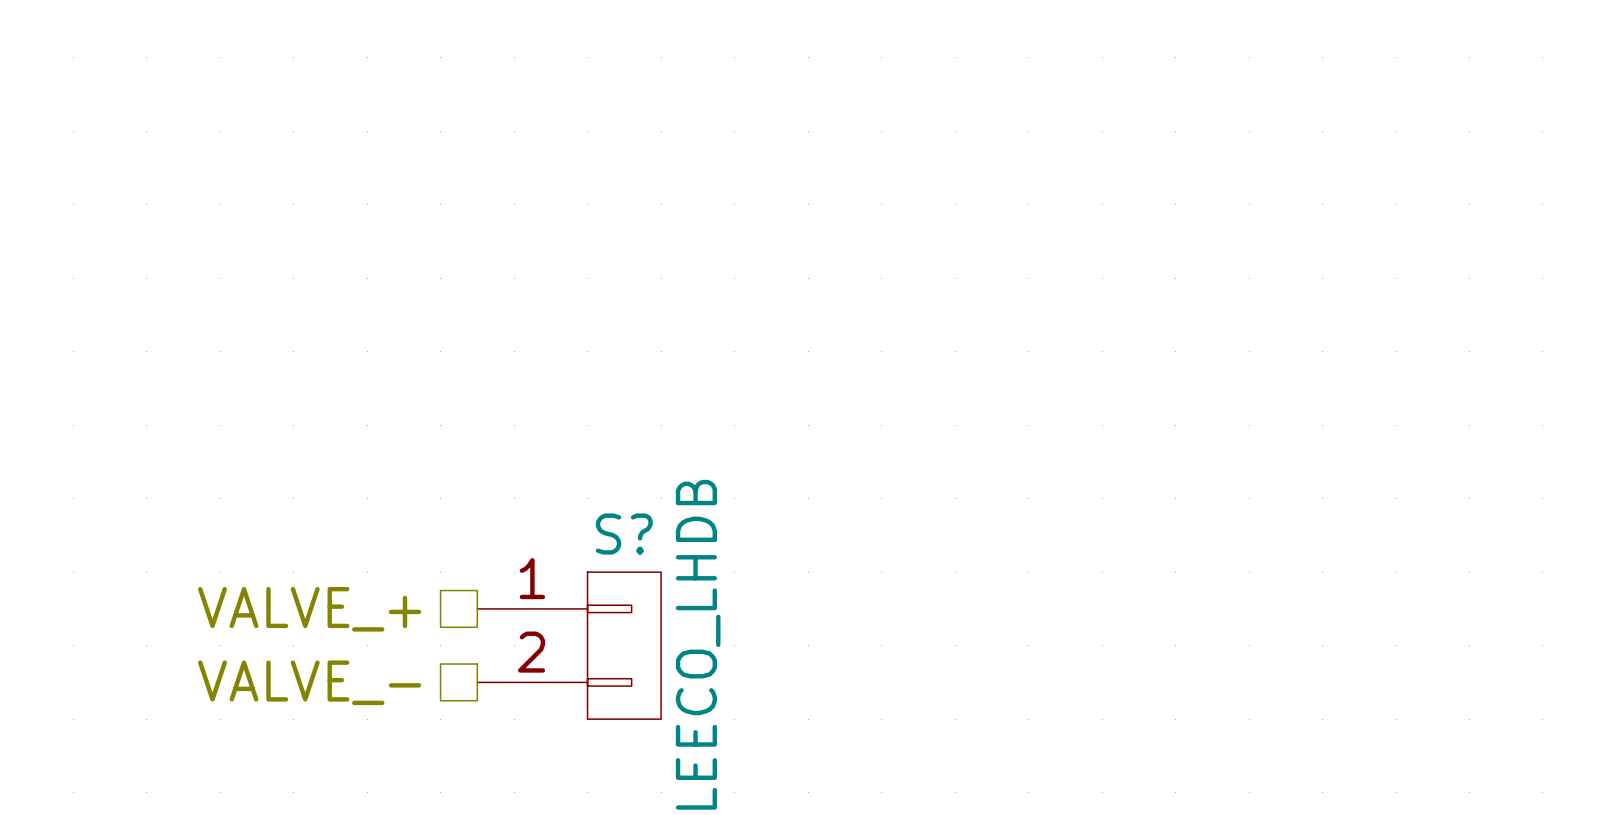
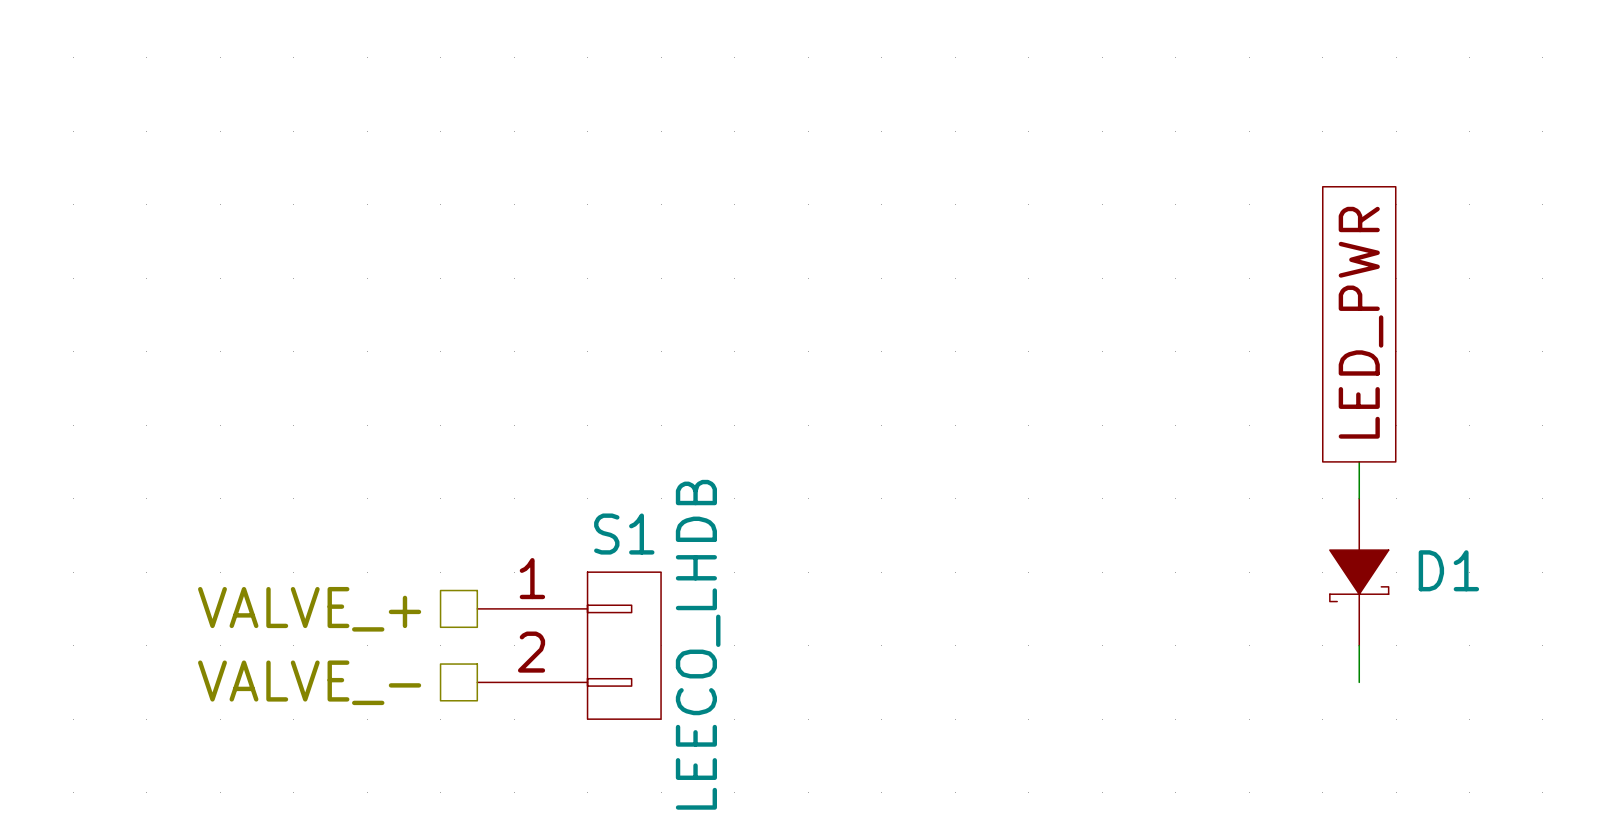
global label: none -> LED_PWR (1361, 322)
wire: none -> (1359, 461) (1359, 498)
S? name: S? (624, 534) -> S1 (624, 534)
D1: none -> (1359, 572)
wire: none -> (1359, 645) (1359, 682)

